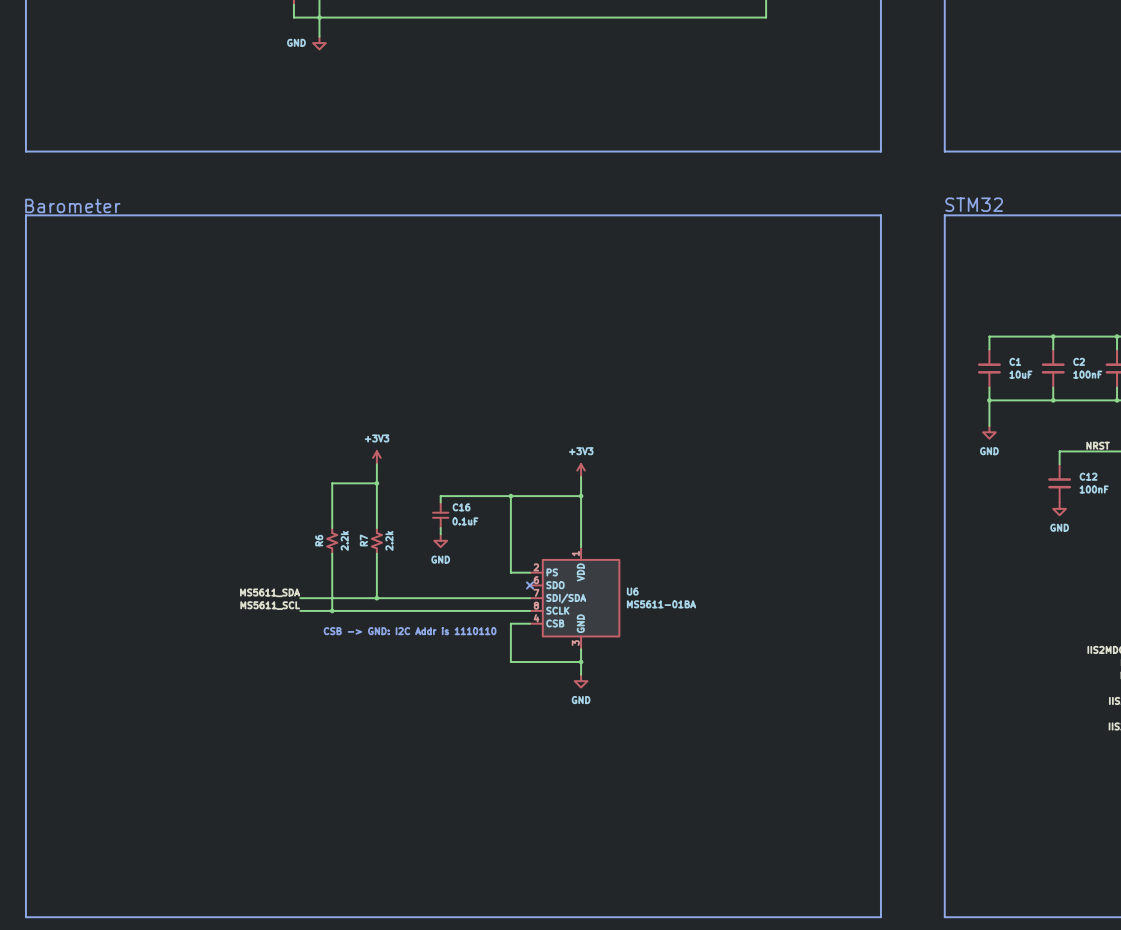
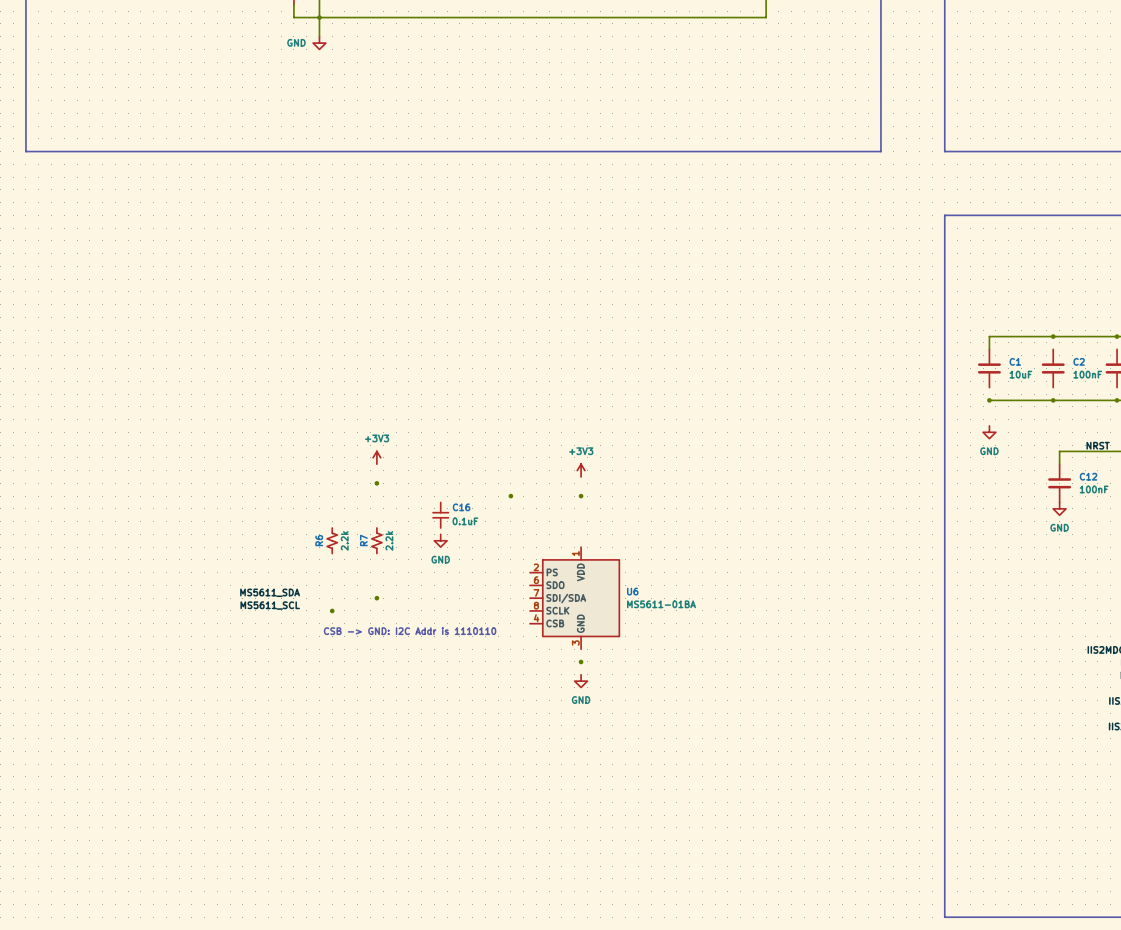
text: STM32 (974, 204) -> none
text: Barometer (72, 205) -> none
line: (25, 215) (880, 215) (880, 917) (25, 917) (25, 215) -> none
wire: (1053, 336) (1053, 349) -> none
wire: (1117, 336) (1117, 349) -> none
wire: (989, 387) (989, 425) -> none
wire: (1053, 387) (1053, 400) -> none
wire: (1117, 387) (1117, 400) -> none
wire: (376, 464) (376, 528) -> none
wire: (581, 476) (581, 547) -> none
wire: (376, 483) (332, 483) (332, 528) -> none
wire: (510, 496) (510, 572) (530, 572) -> none
wire: (581, 496) (440, 496) (440, 502) -> none
wire: (440, 528) (440, 534) -> none
wire: (332, 553) (332, 610) -> none
wire: (376, 553) (376, 598) -> none
no-connect mark: (530, 585) -> none
wire: (300, 598) (530, 598) -> none
wire: (300, 610) (530, 610) -> none
wire: (530, 623) (510, 623) (510, 661) (581, 661) -> none
wire: (581, 649) (581, 674) -> none

